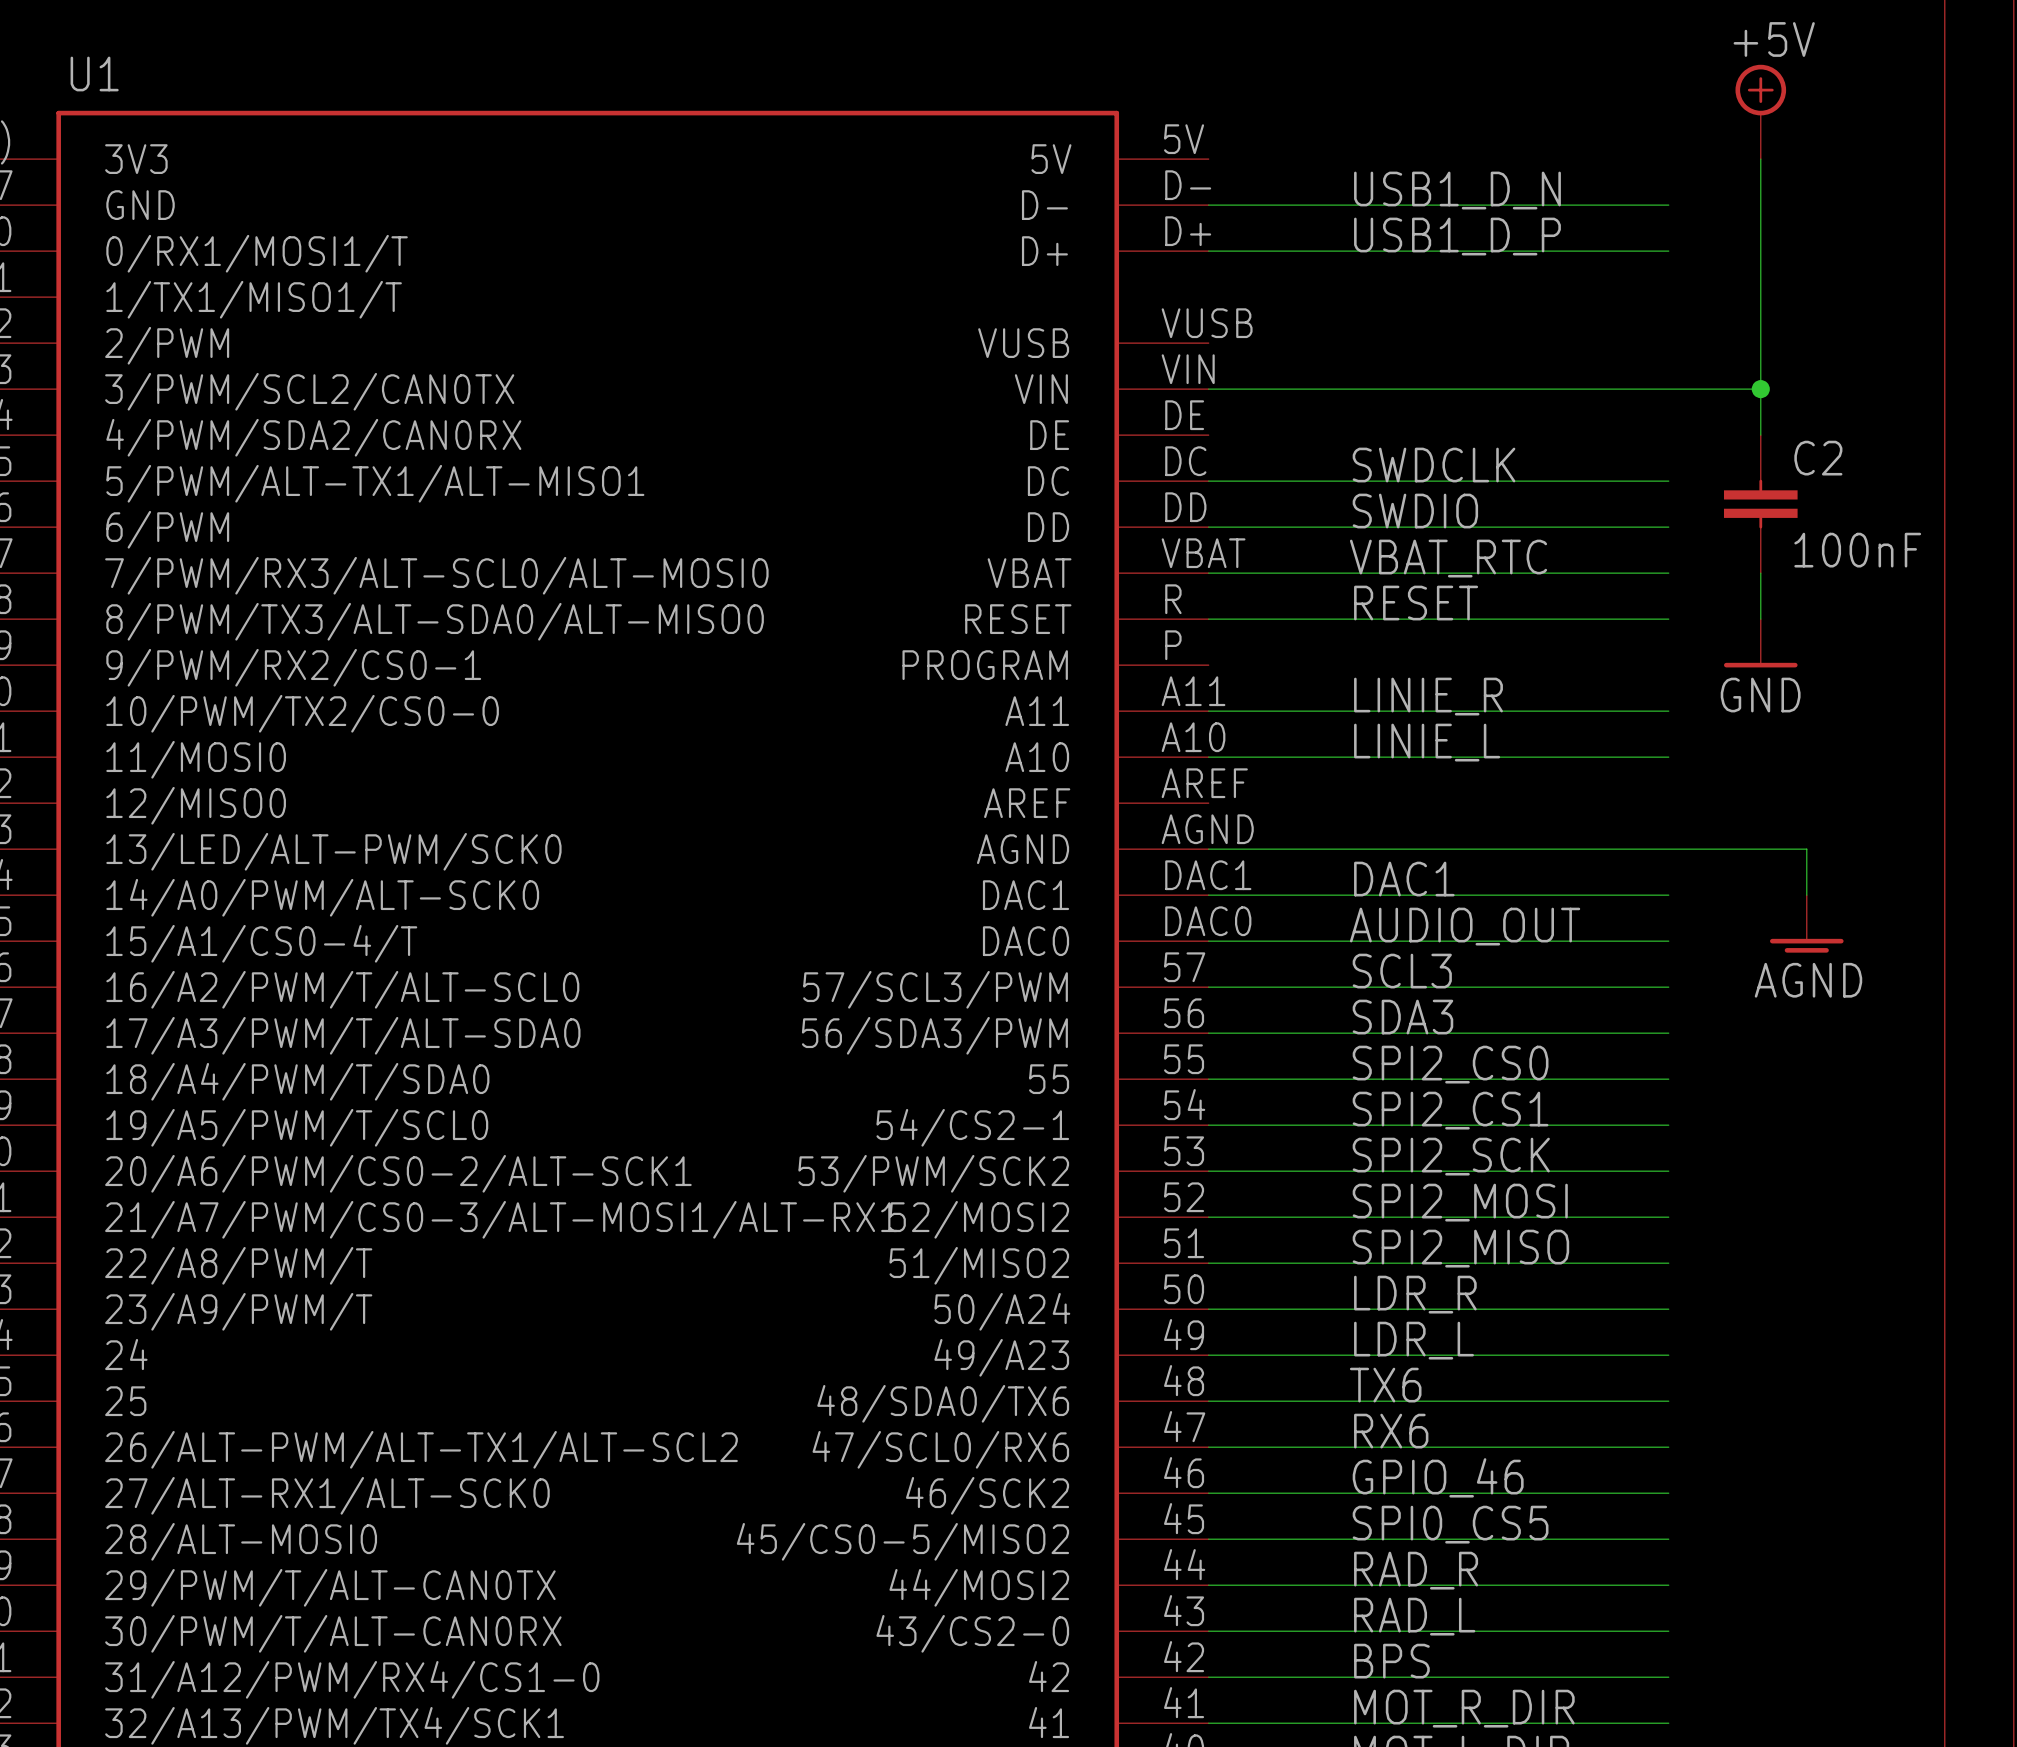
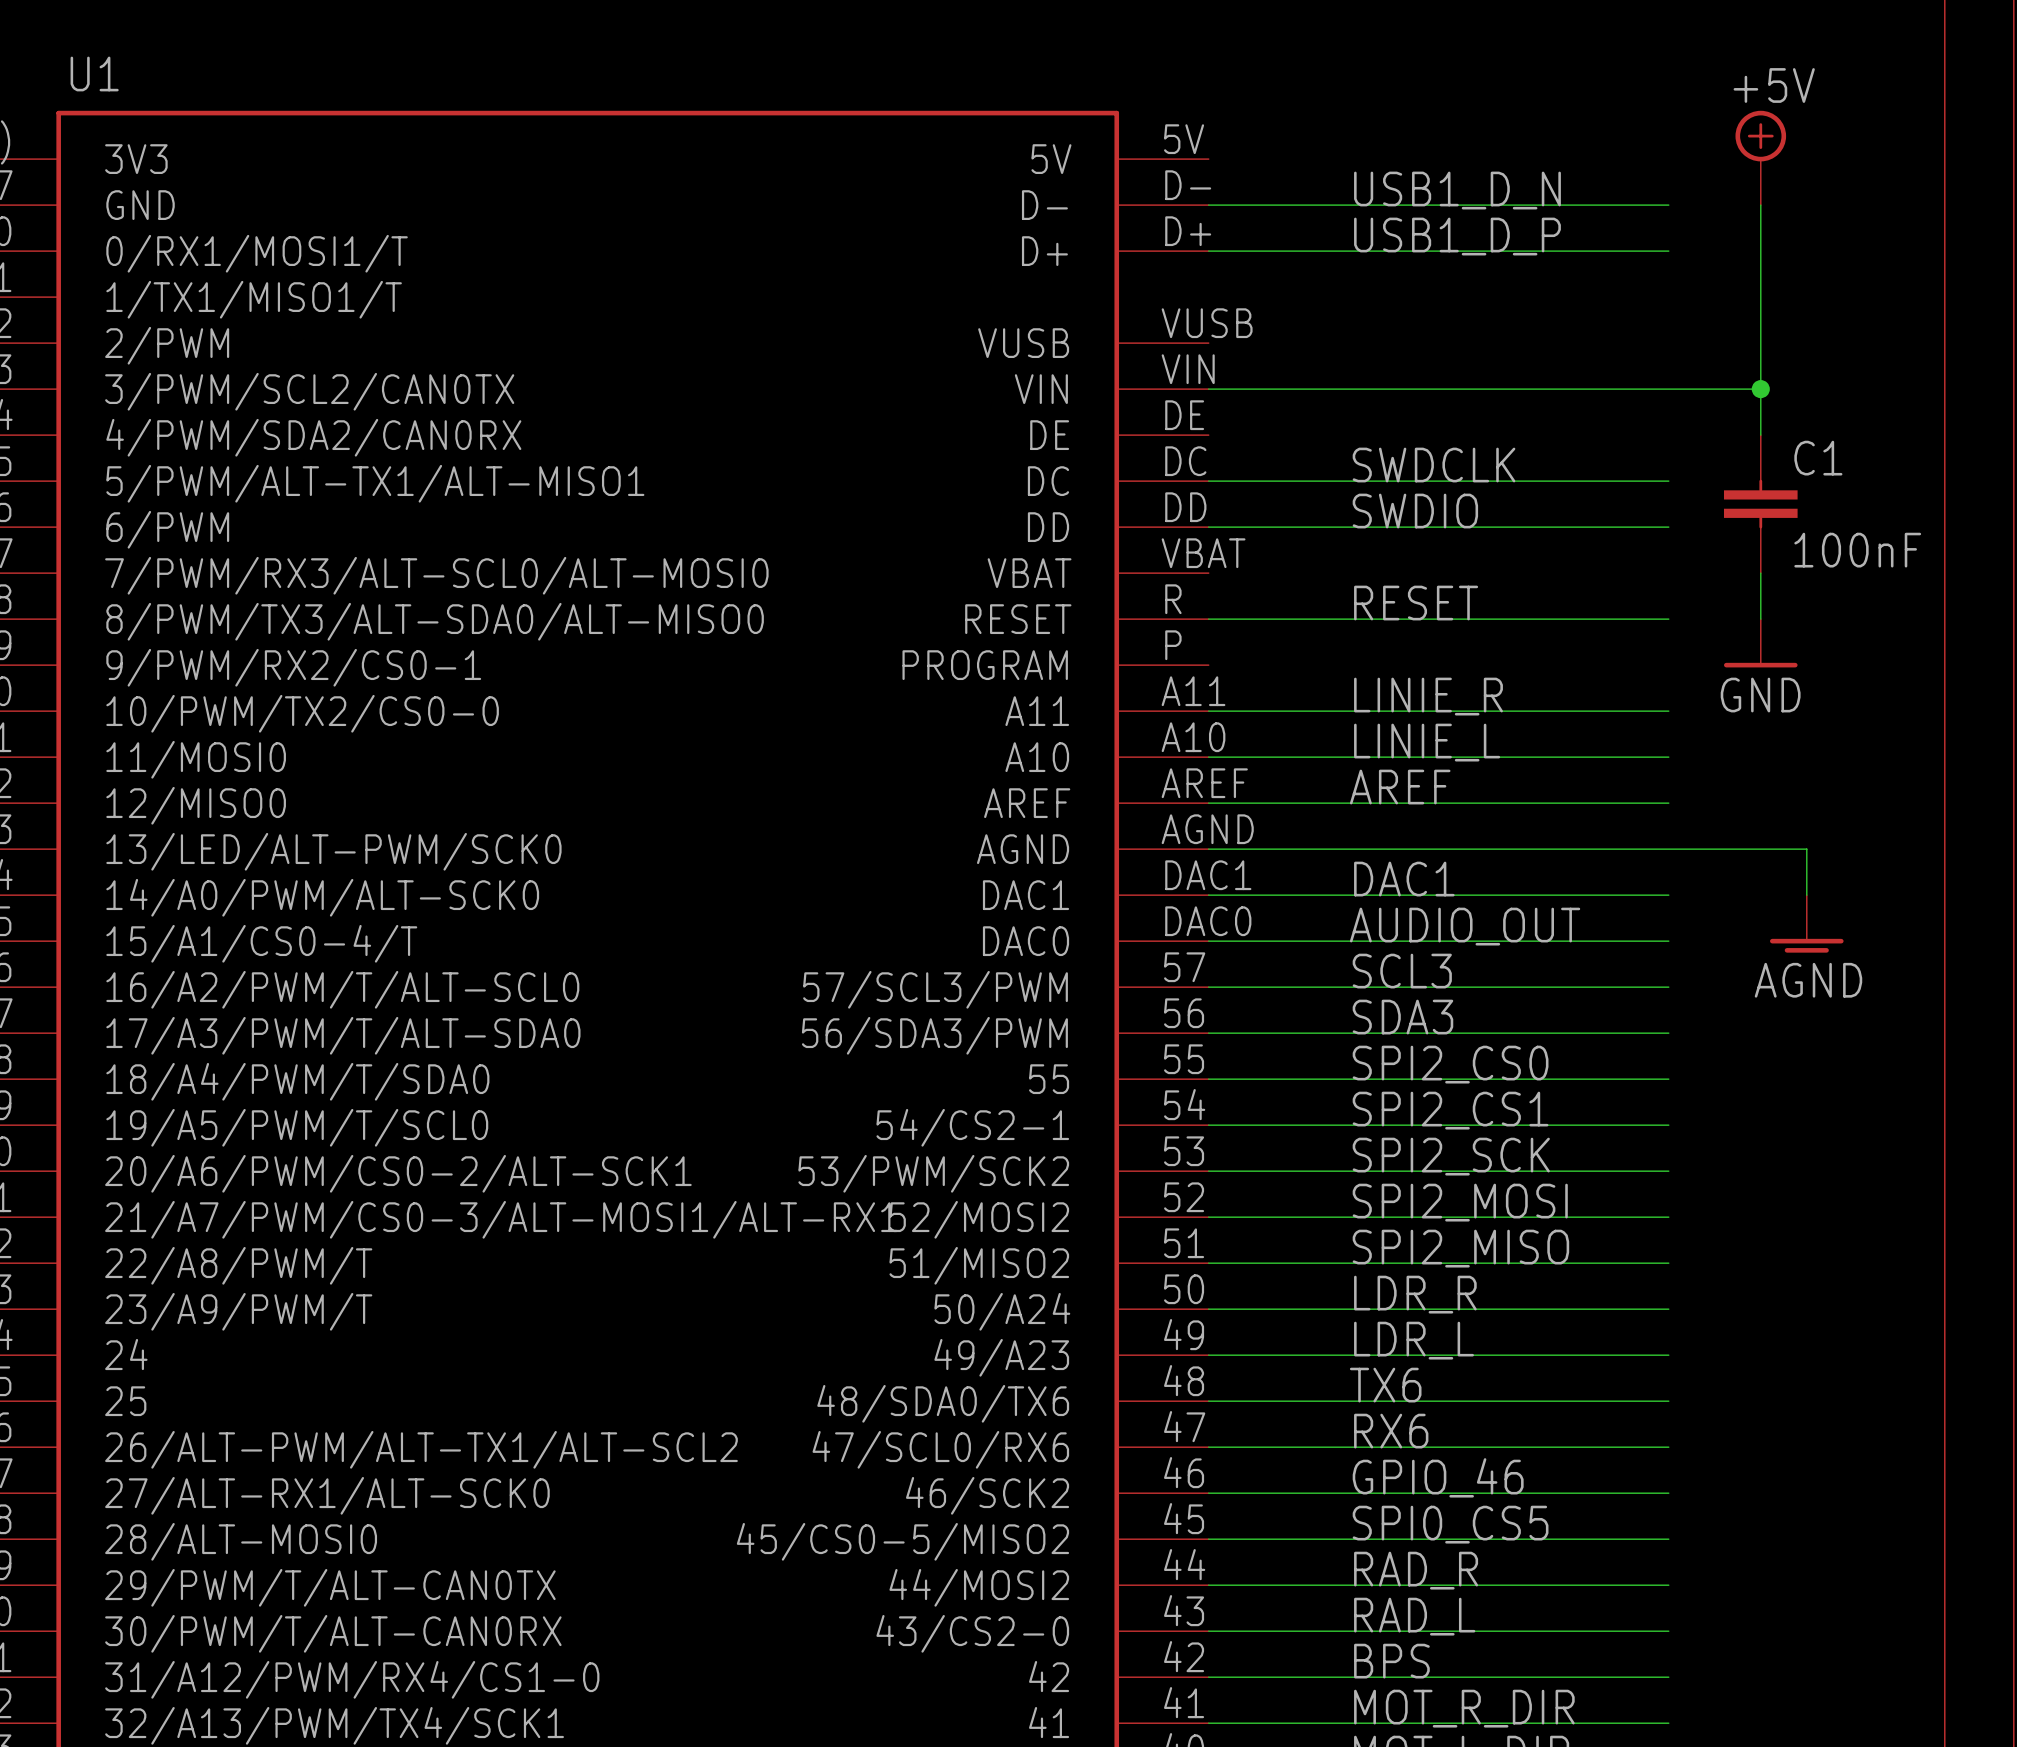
power symbol position: +5V (1760, 111) -> +5V (1760, 157)
C2 name: C2 (1818, 458) -> C1 (1818, 458)
label: VBAT_RTC (1448, 558) -> none
wire: (1208, 573) (1668, 573) -> (1208, 803) (1668, 803)
label: none -> AREF (1400, 787)

